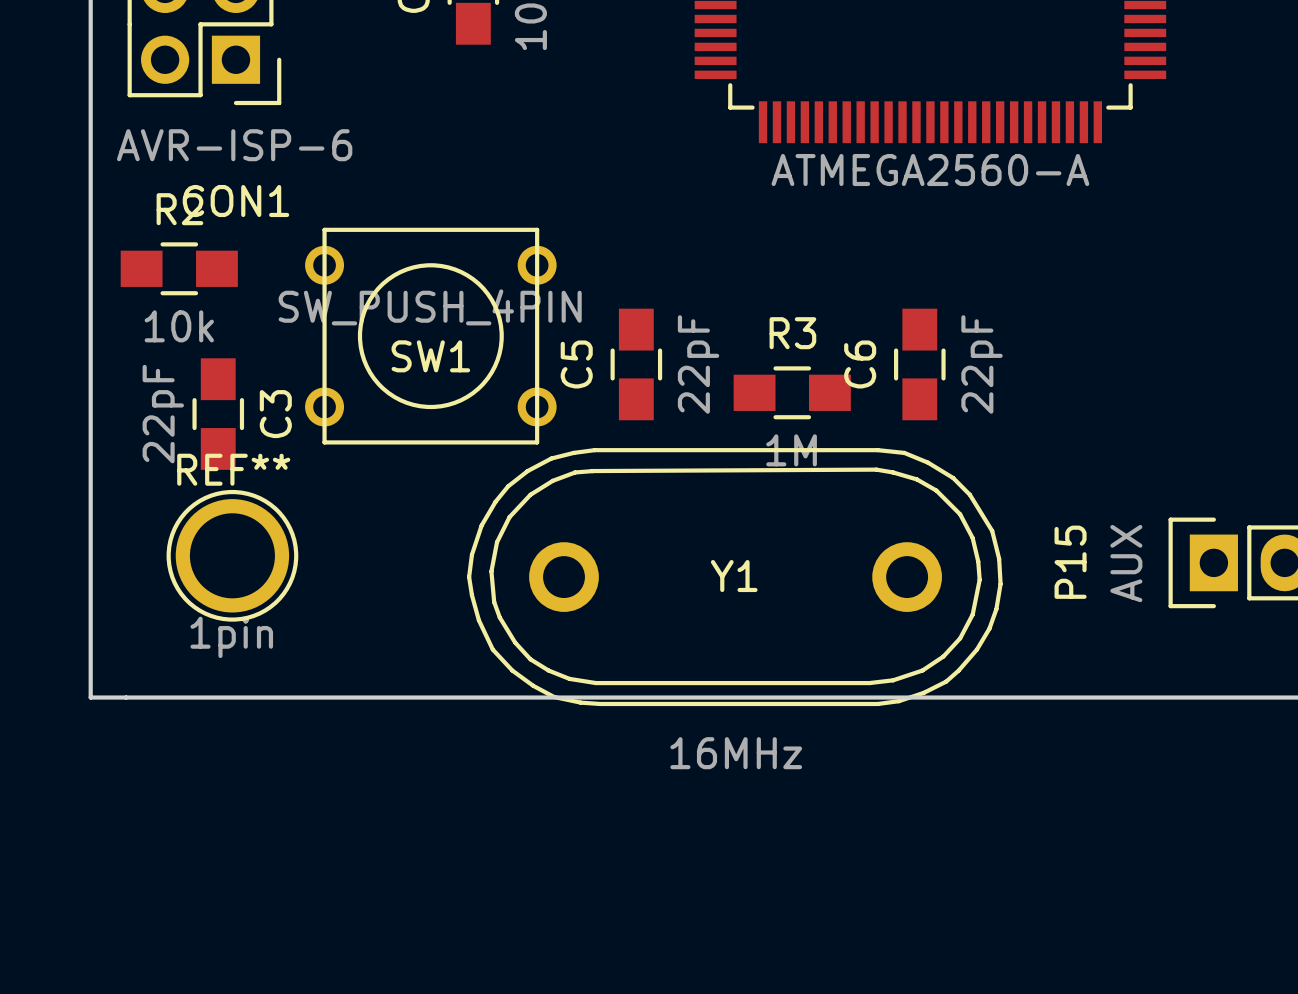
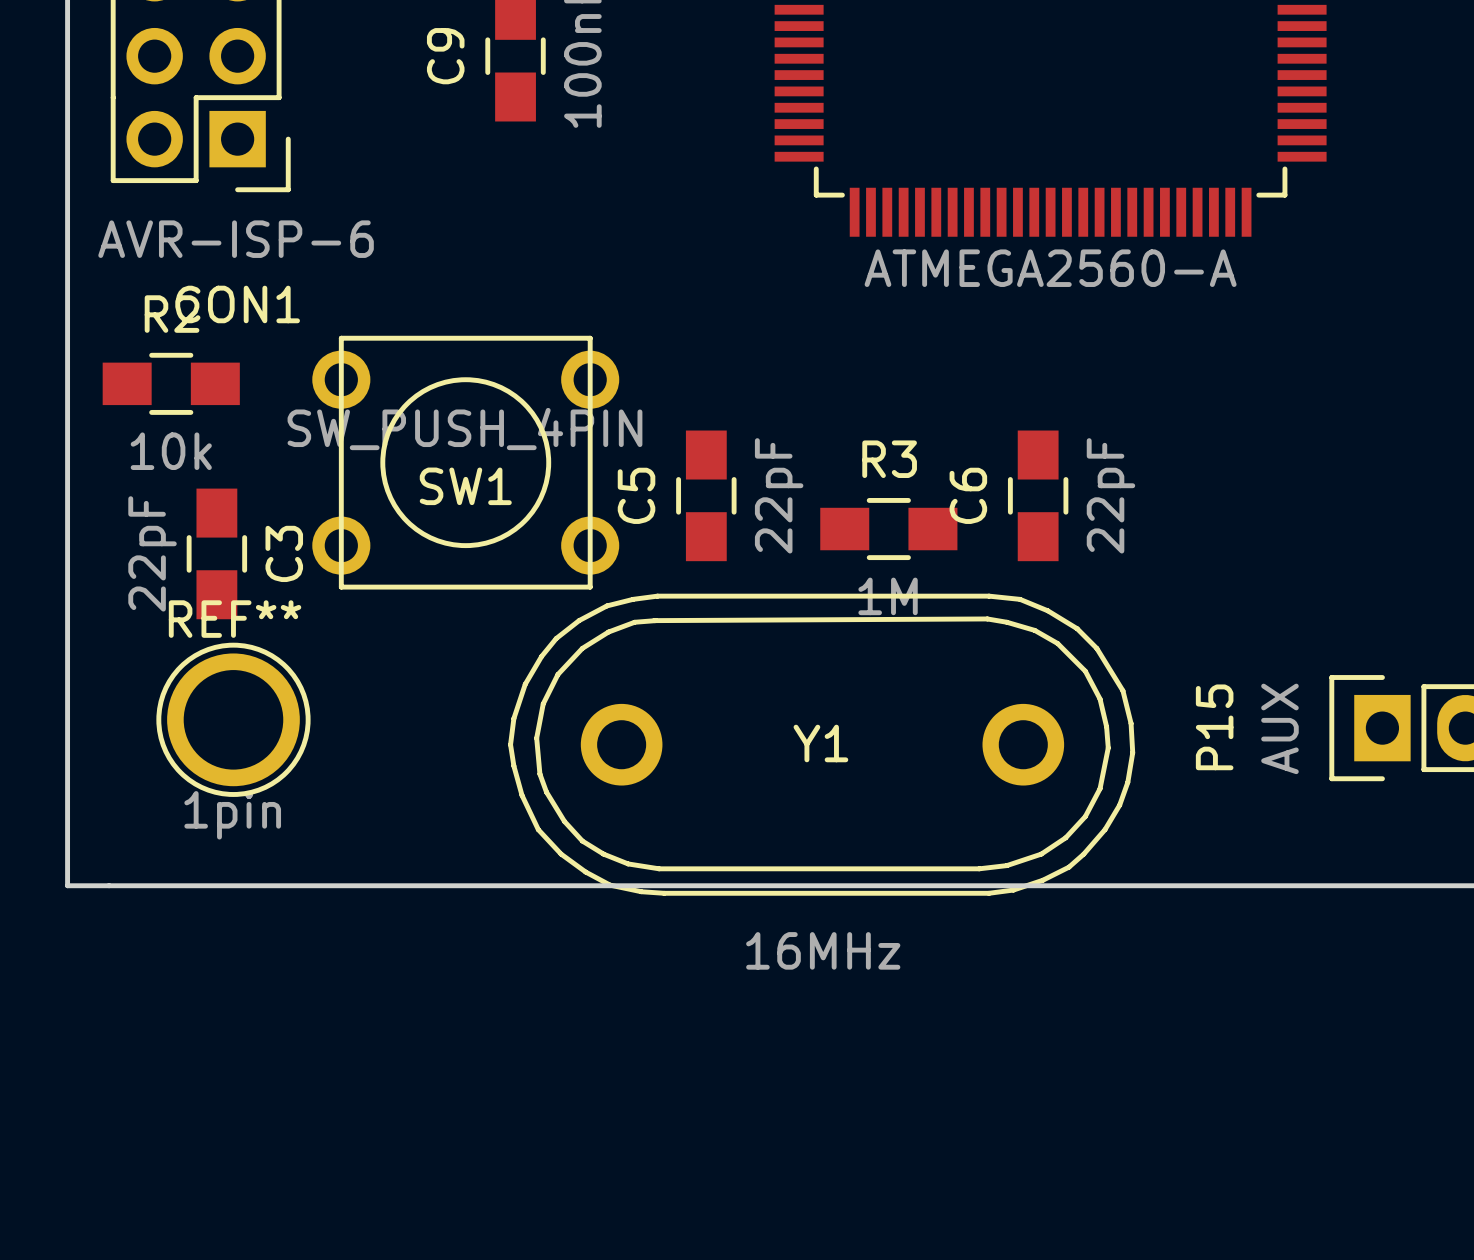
SW1 footprint: [305, 227, 557, 445] -> [312, 335, 620, 590]

